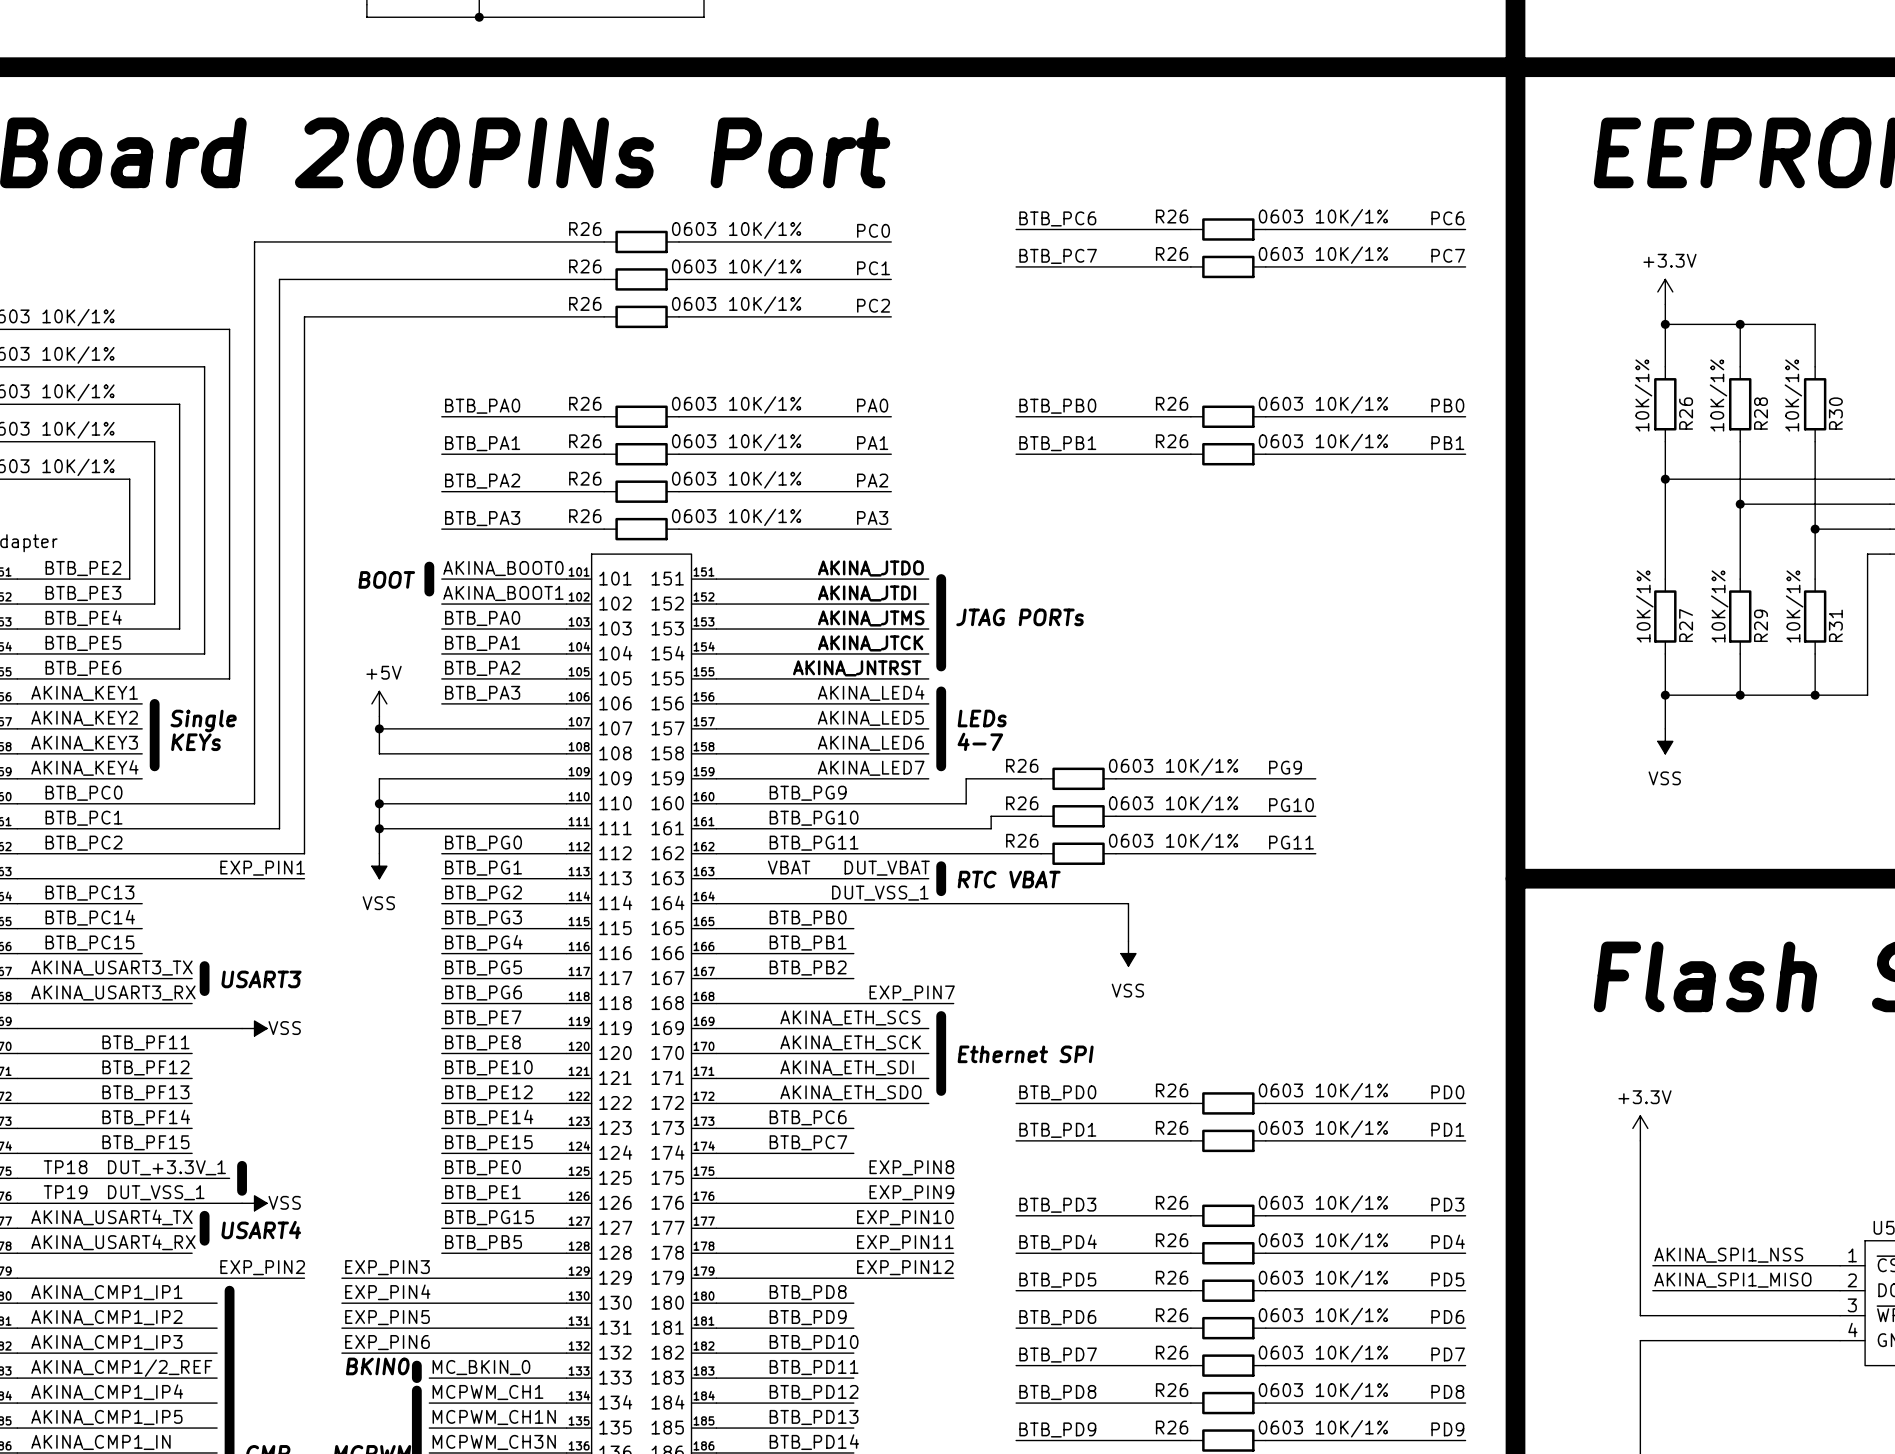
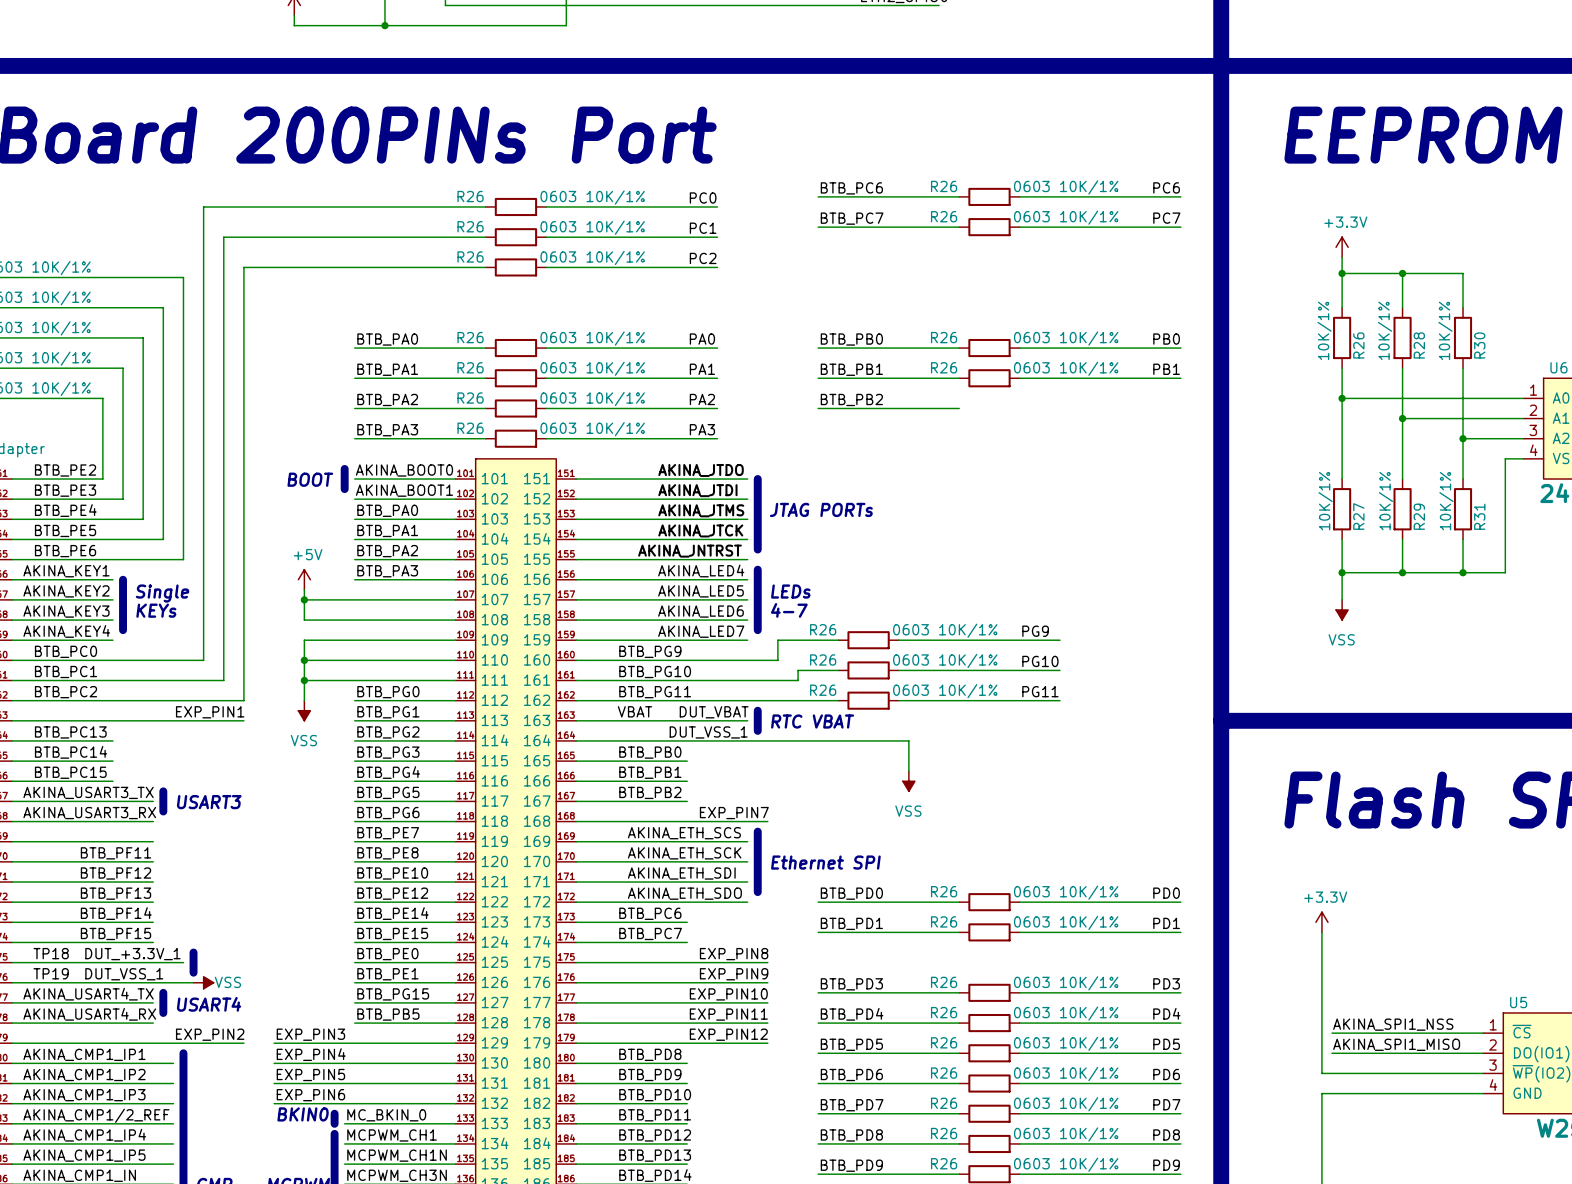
label: none -> BTB_PB2 (851, 399)
wire: none -> (818, 408) (959, 408)
wire: (192, 1028) (242, 1028) -> none
power symbol: VSS (254, 1028) -> none

